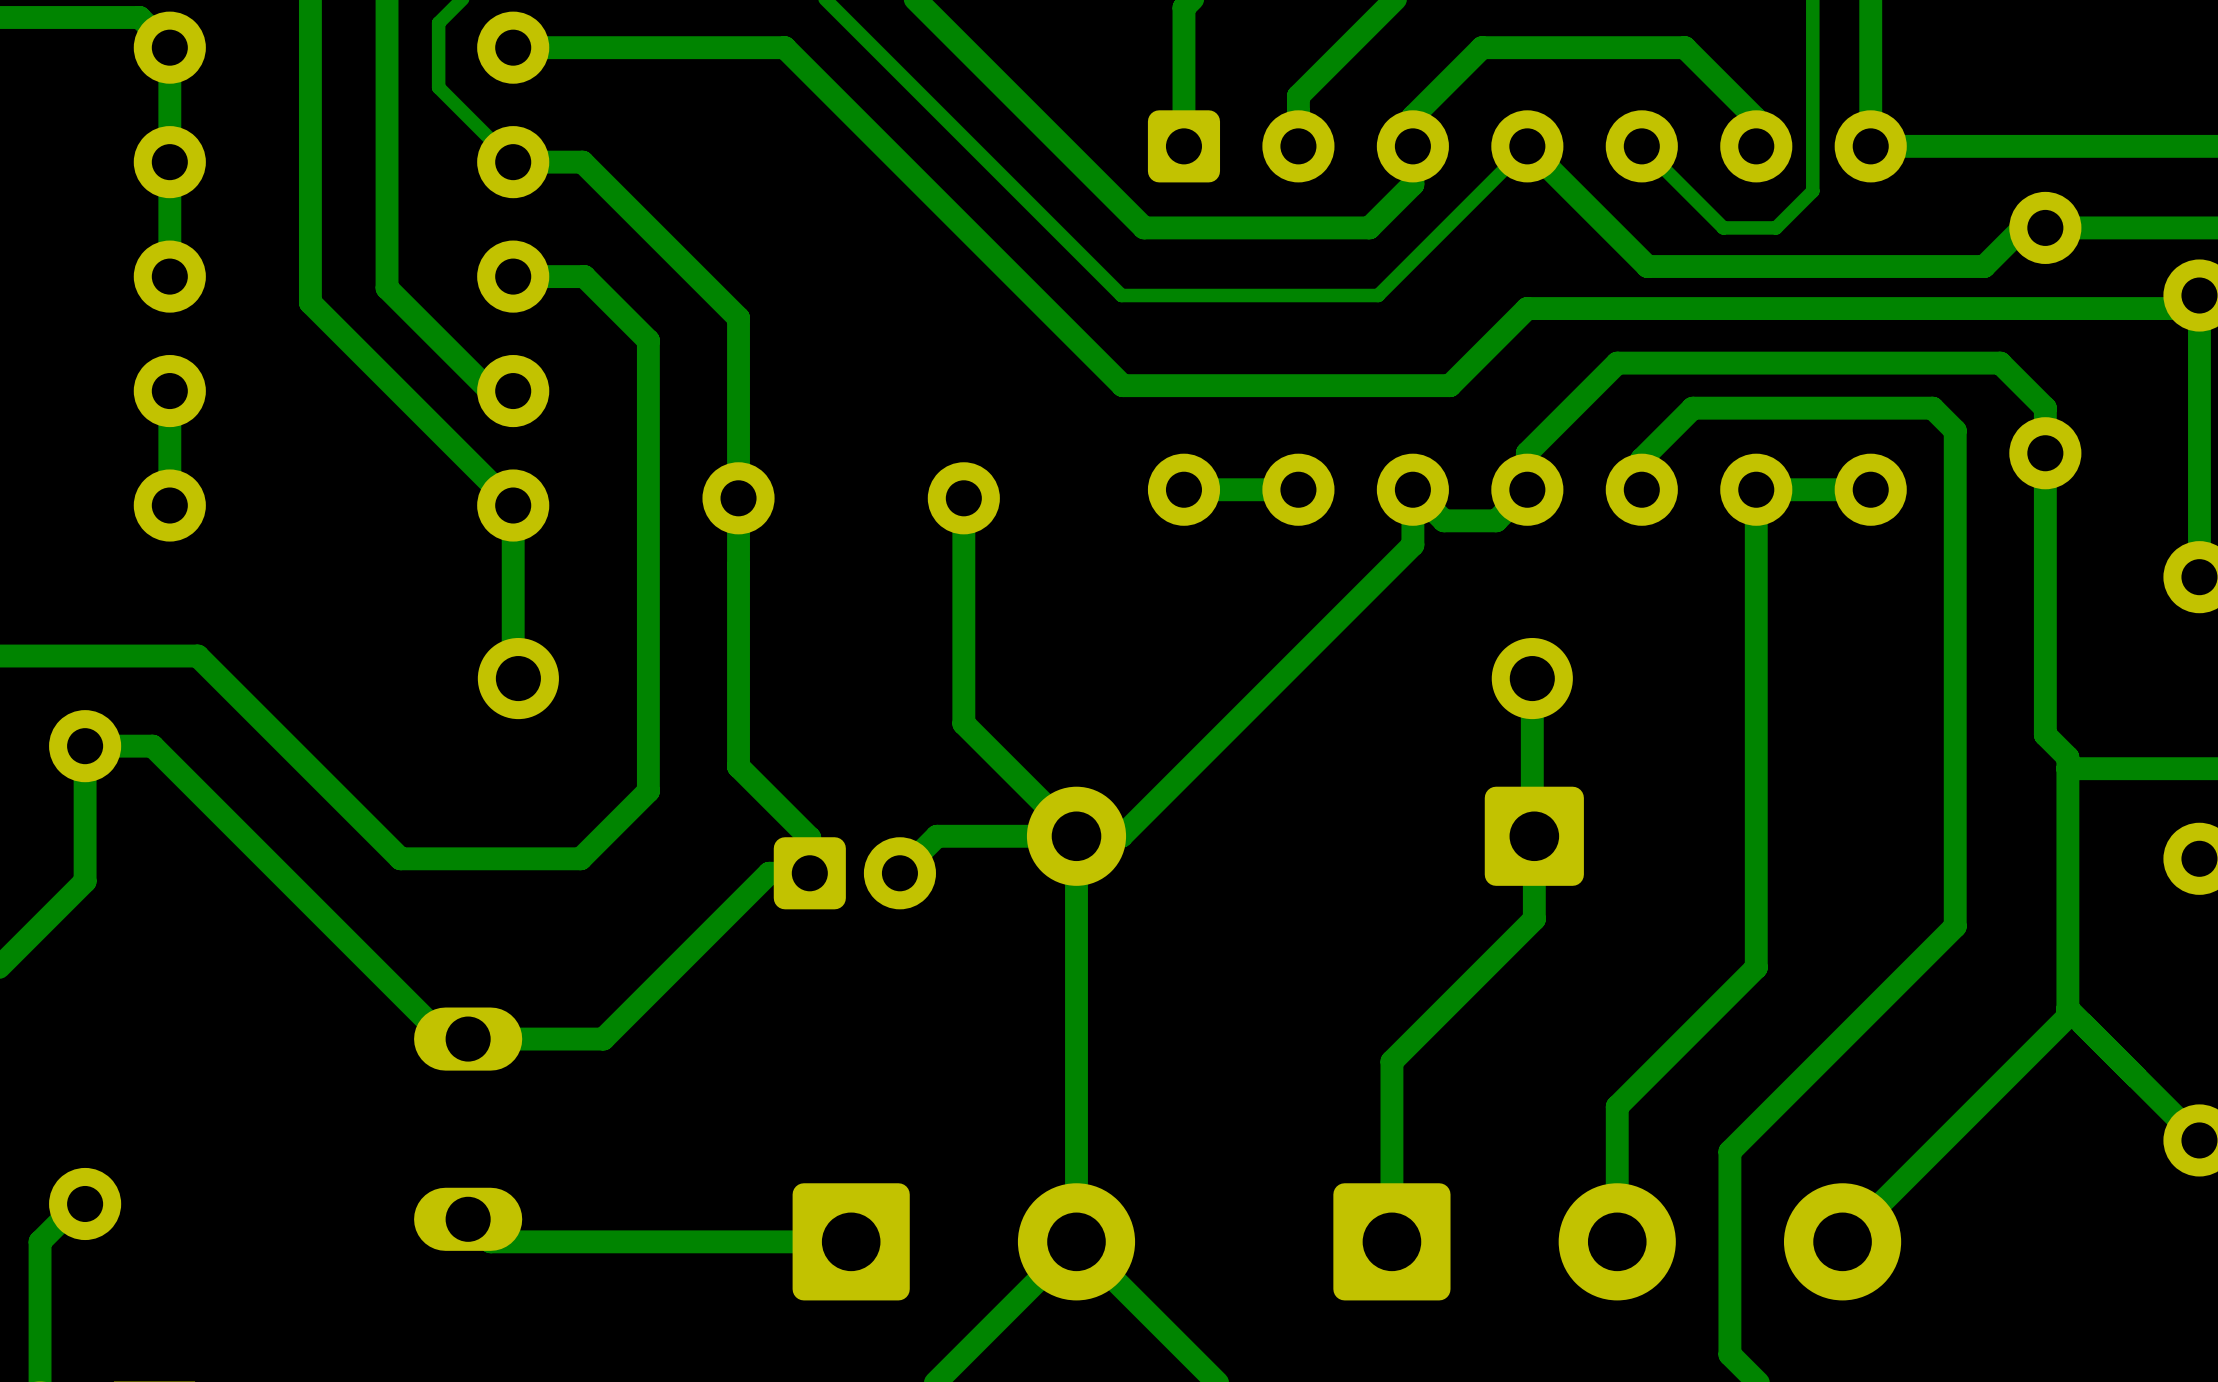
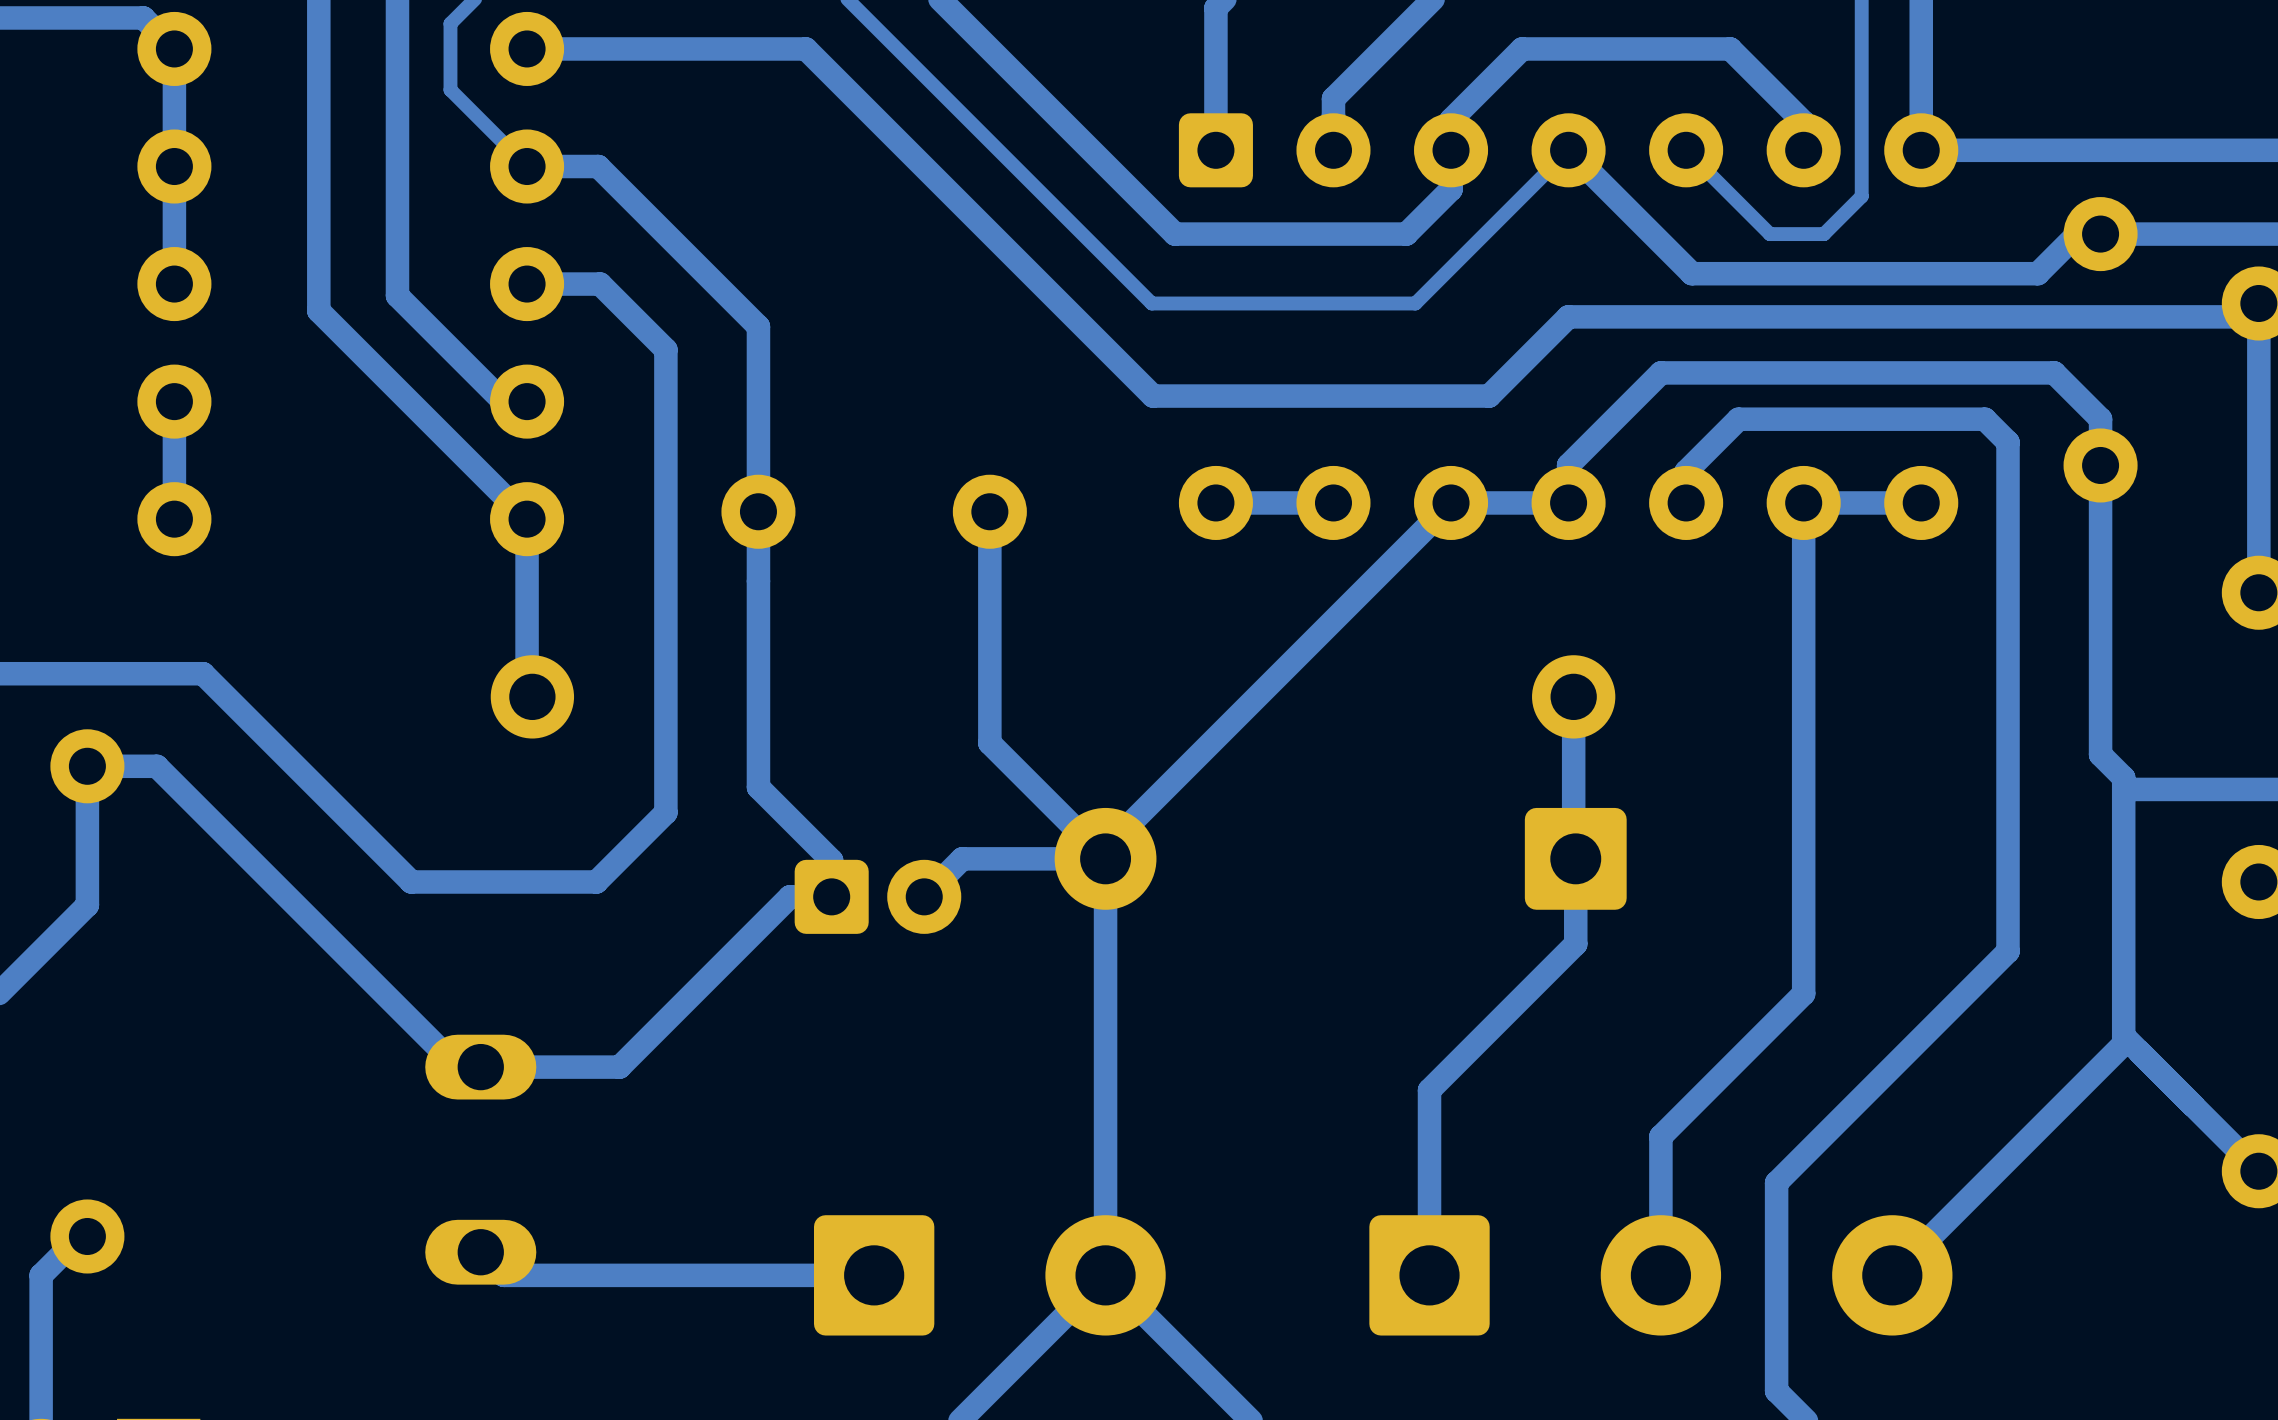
bottom track: (1527, 489) (1496, 520) (1443, 520) (1412, 489) (1412, 544) (1121, 836) (1076, 836) -> (1568, 502) (1451, 502) (1105, 848) (1105, 858)

